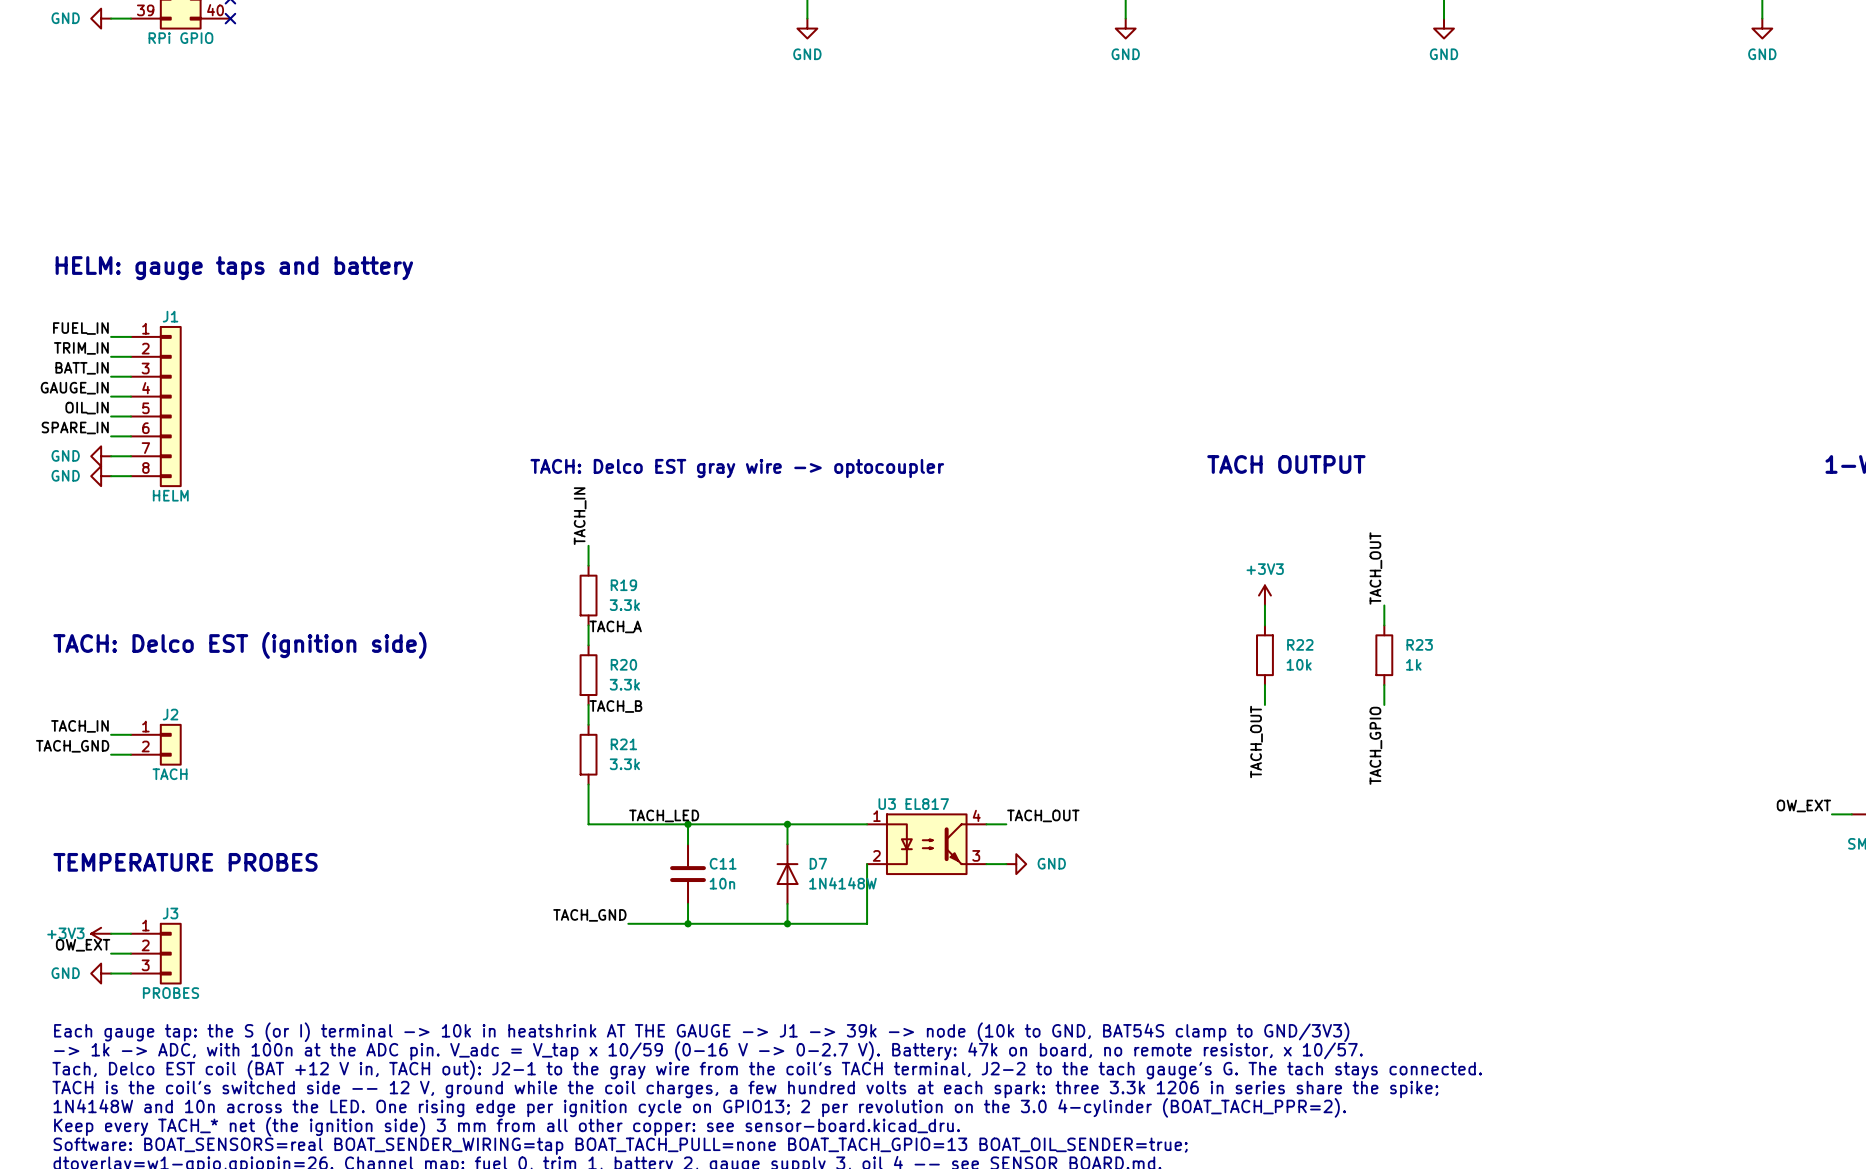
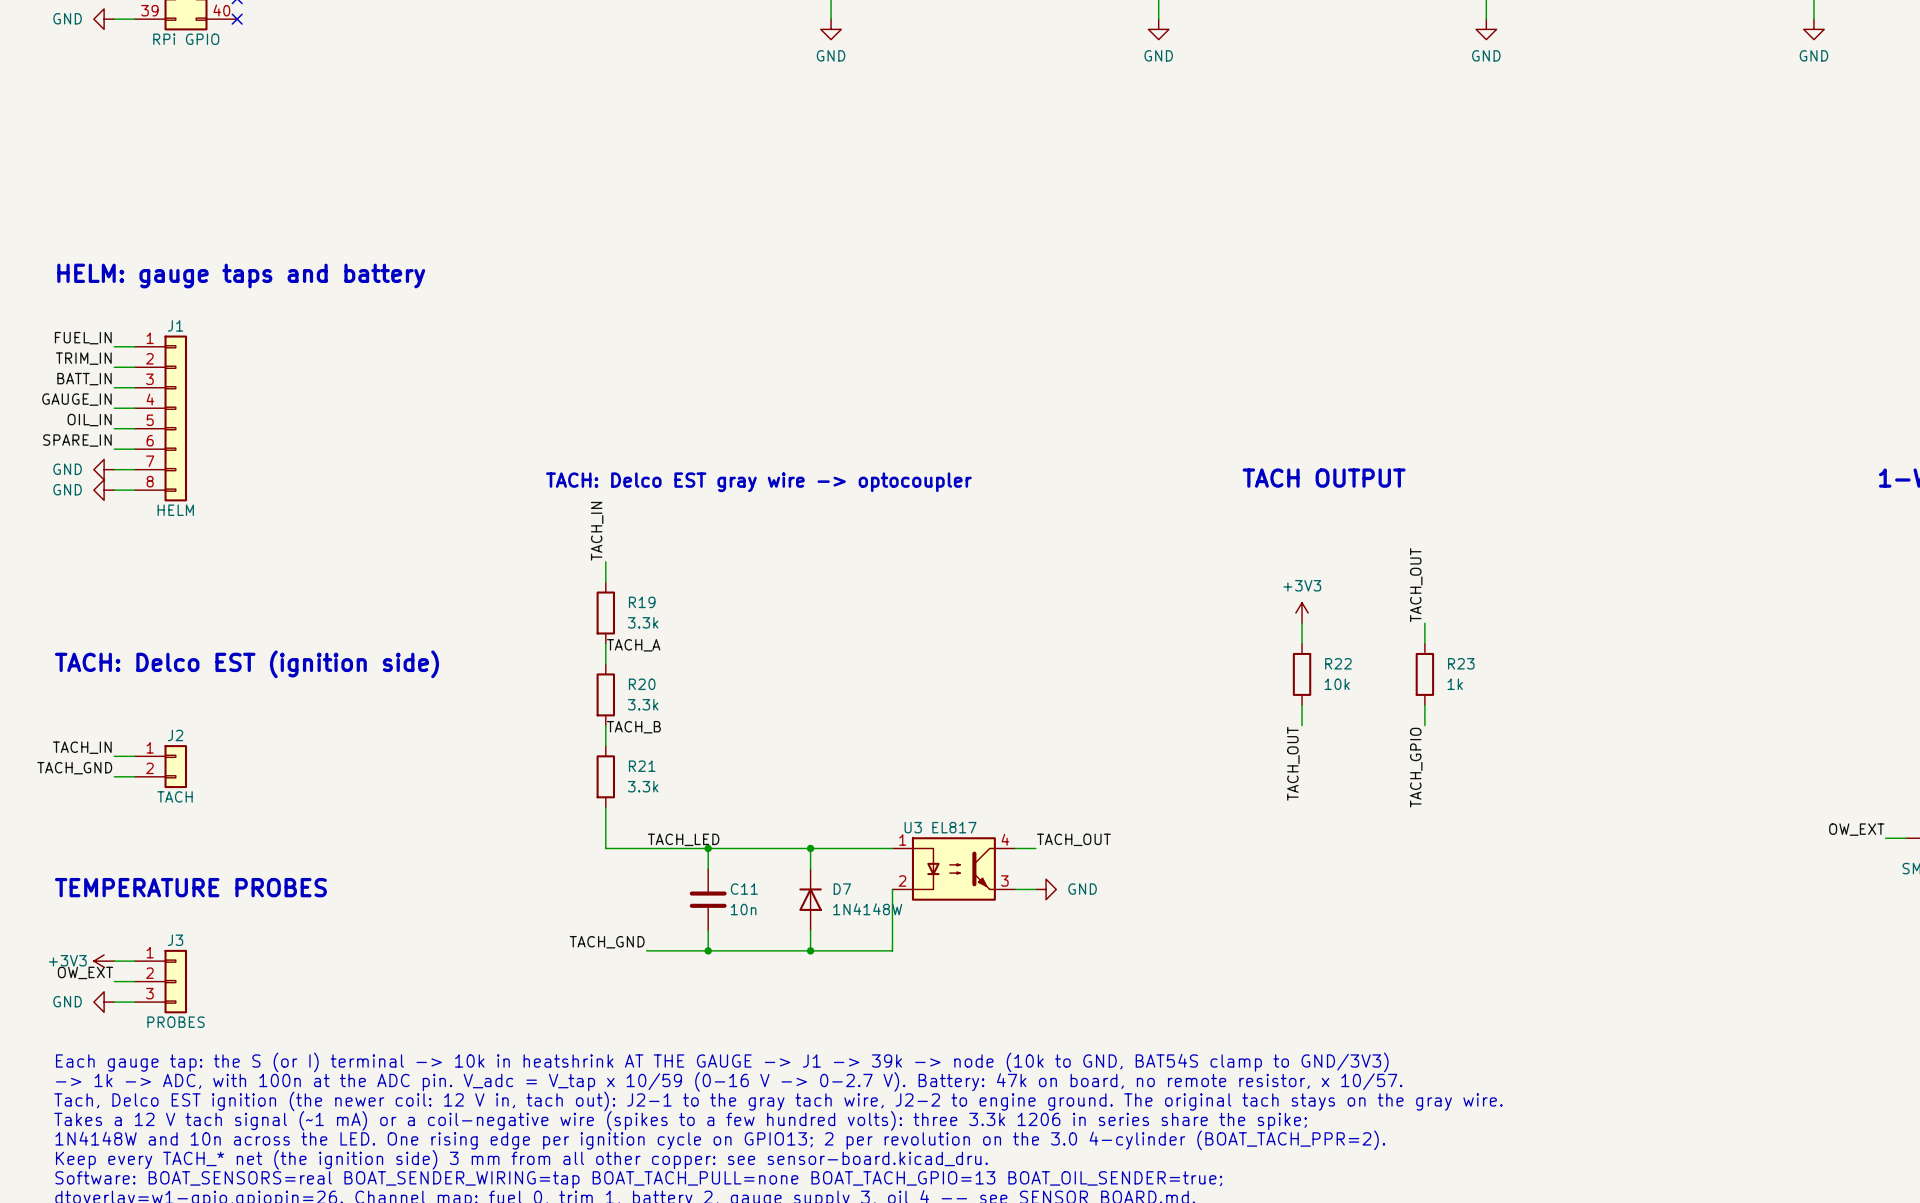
text: Tach, Delco EST coil (BAT +12 V in, TACH out): J2-1 to the gray wire from the coil's TACH terminal, J2-2 to the tach gauge's G. The tach stays connected. (767, 1070) -> Tach, Delco EST ignition (the newer coil: 12 V in, tach out): J2-1 to the gray tach wire, J2-2 to engine ground. The original tach stays on the gray wire. (778, 1101)
text: TACH is the coil's switched side -- 12 V, ground while the coil charges, a few hundred volts at each spark: three 3.3k 1206 in series share the spike; (745, 1089) -> Takes a 12 V tach signal (~1 mA) or a coil-negative wire (spikes to a few hundred volts): three 3.3k 1206 in series share the spike; (680, 1120)

